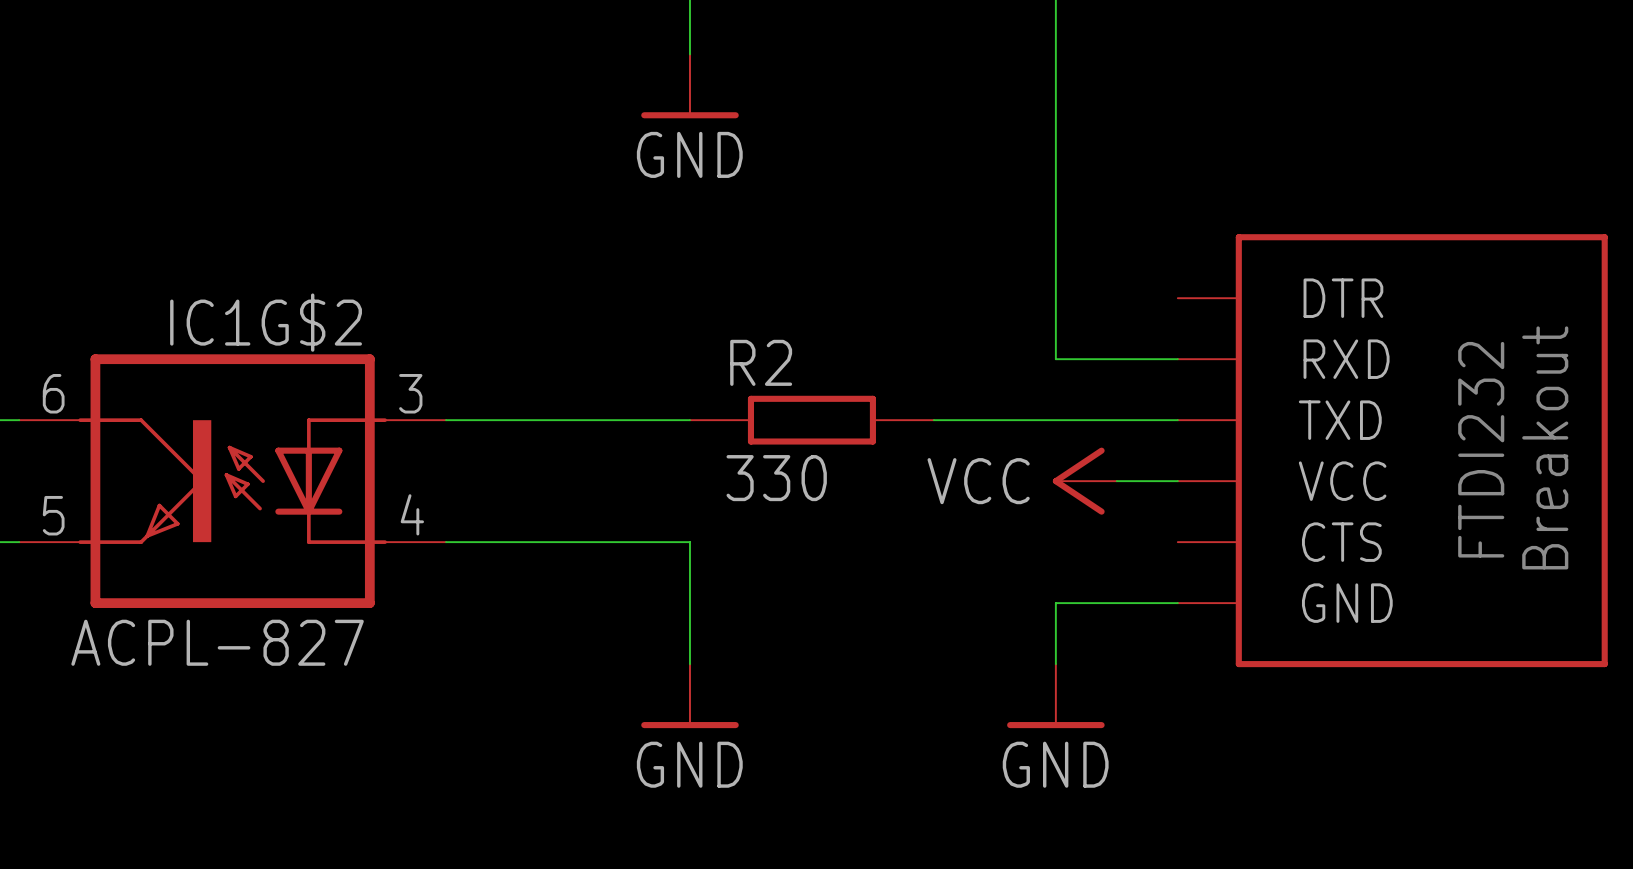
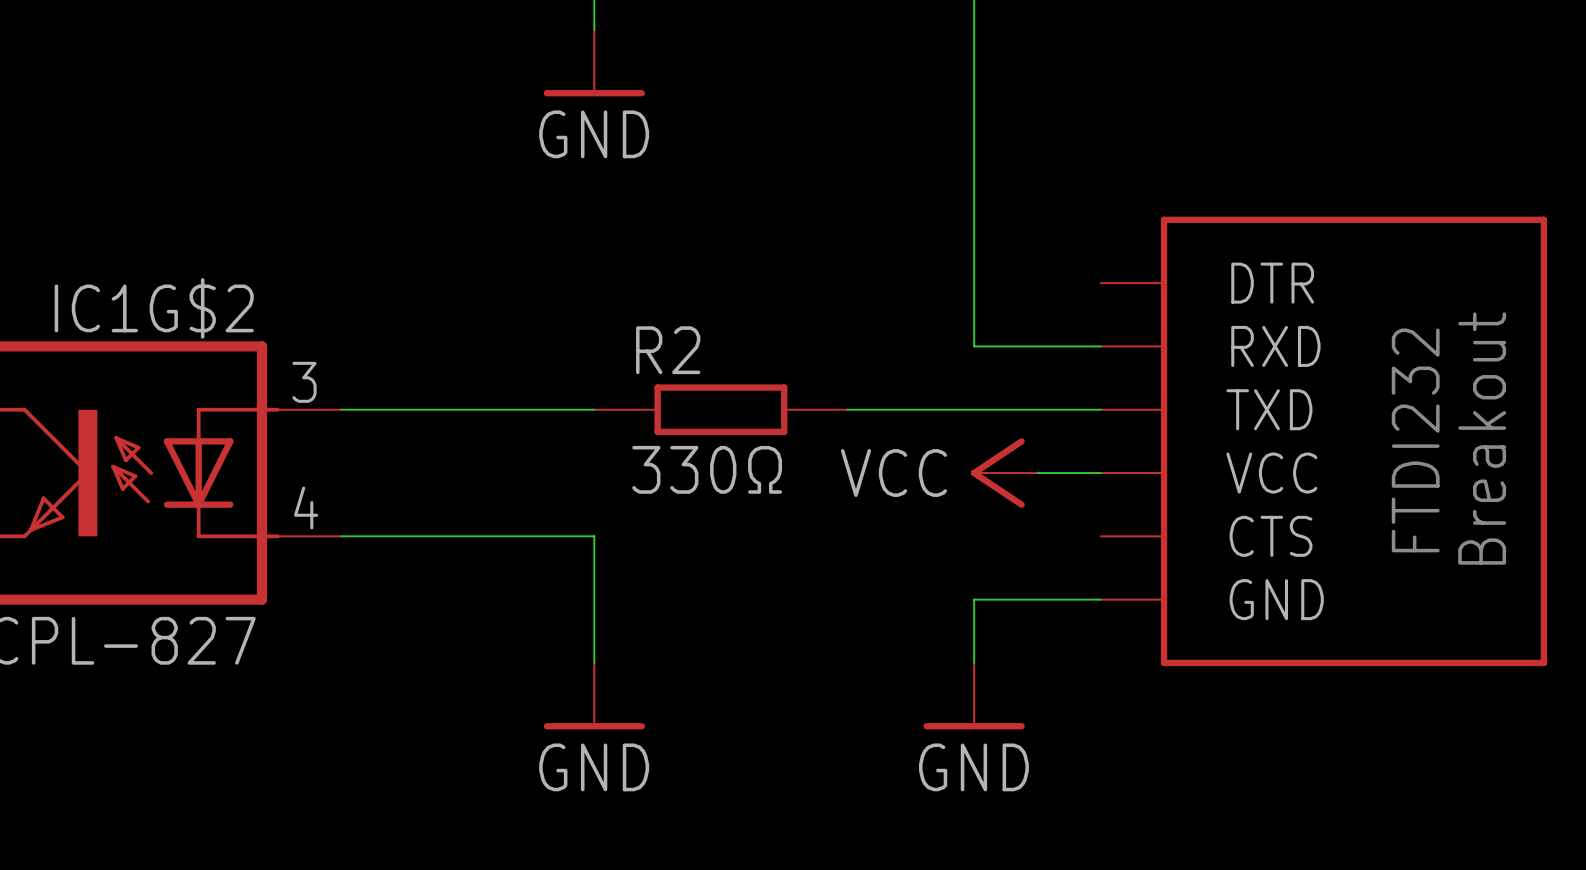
R2 value: 330 (776, 478) -> 330Ω (707, 469)

